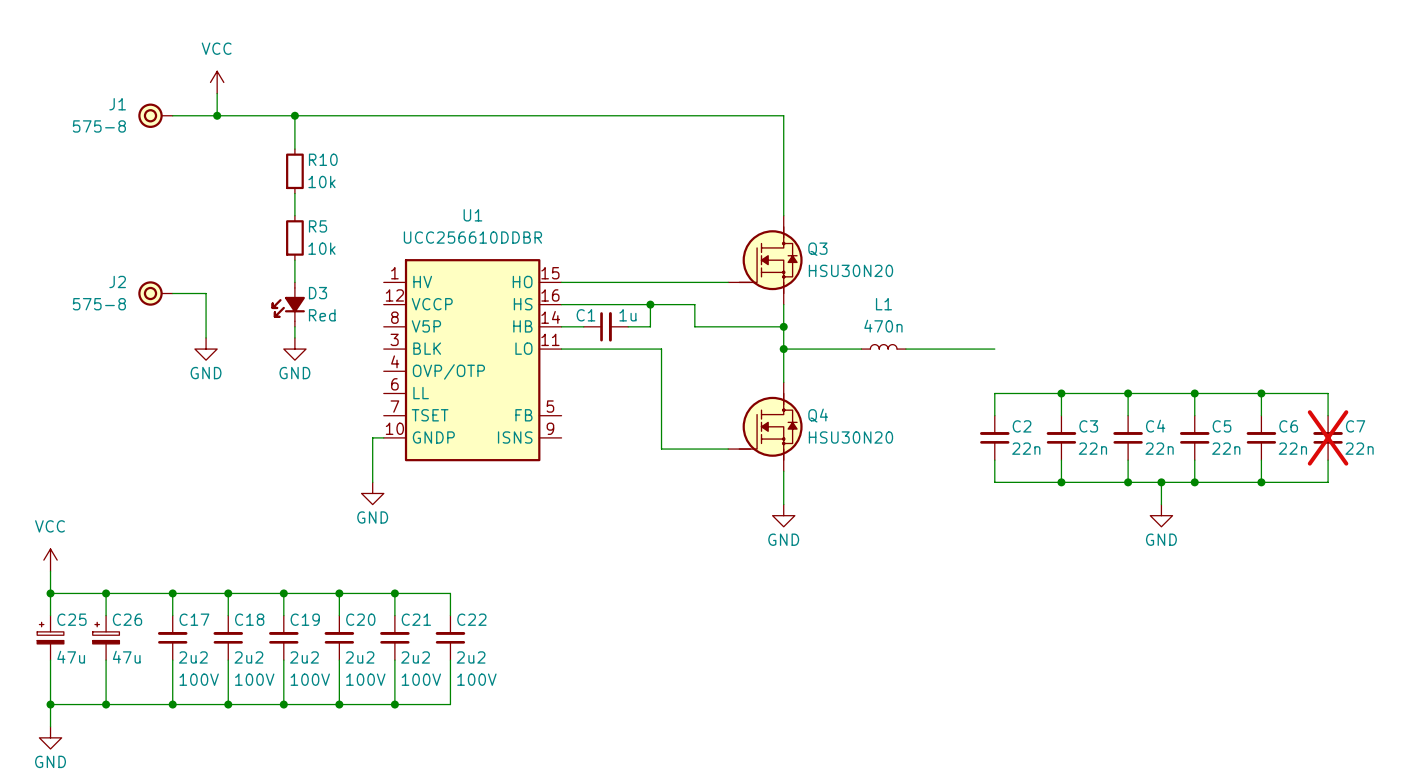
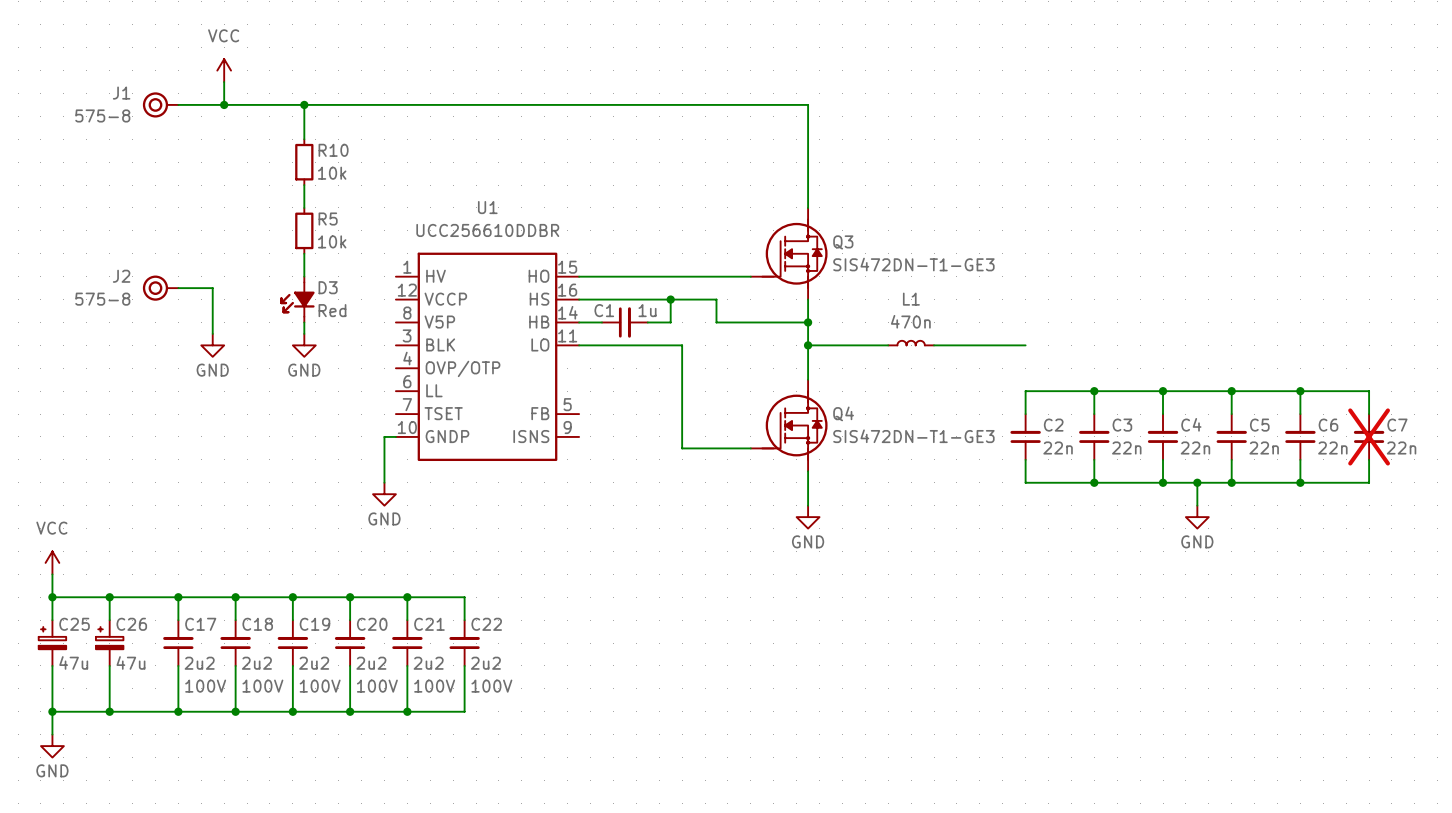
Q3 text: HSU30N20 (850, 270) -> SIS472DN-T1-GE3 (913, 264)
Q4 text: HSU30N20 (850, 437) -> SIS472DN-T1-GE3 (913, 436)

